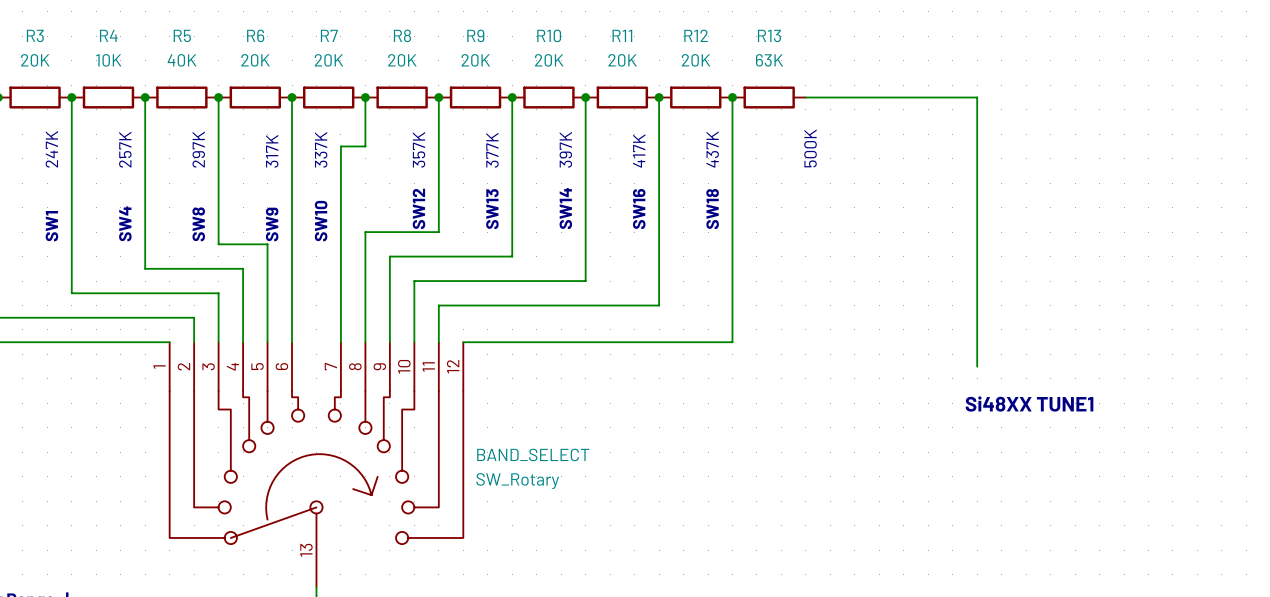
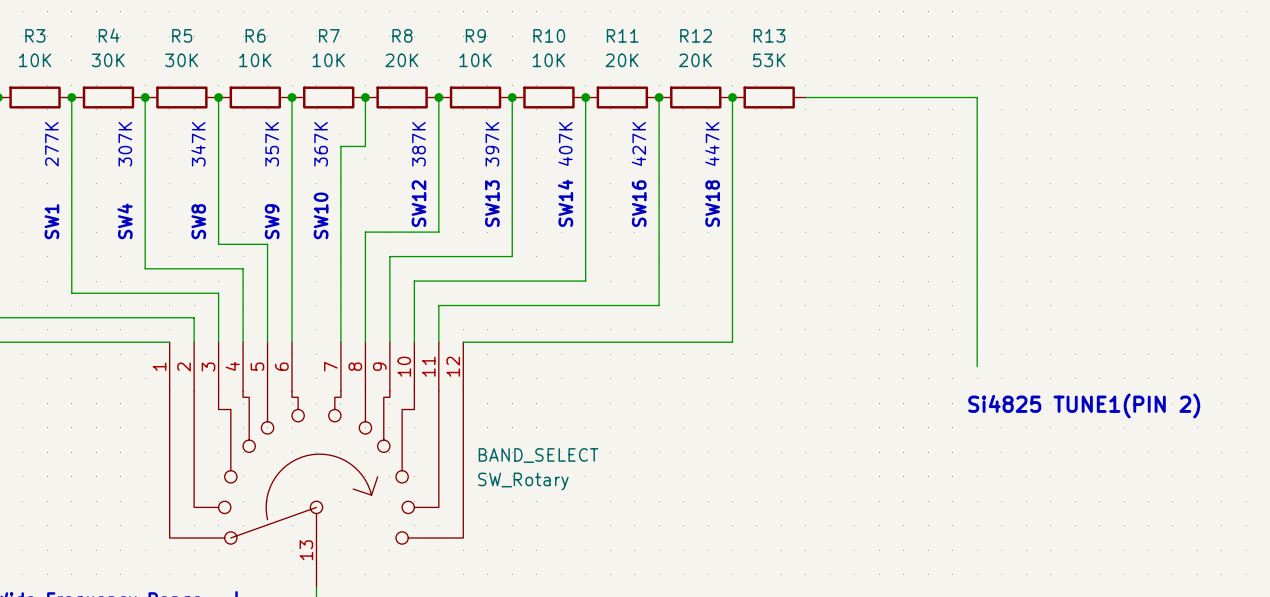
R3 value: 20K (35, 60) -> 10K (35, 60)
R4 value: 10K (108, 60) -> 30K (108, 60)
R5 value: 40K (182, 60) -> 30K (181, 60)
R6 value: 20K (255, 60) -> 10K (255, 60)
R7 value: 20K (328, 60) -> 10K (328, 60)
R9 value: 20K (475, 60) -> 10K (475, 60)
R10 value: 20K (549, 60) -> 10K (548, 60)
R13 value: 63K (769, 60) -> 53K (769, 60)
text: 500K (810, 148) -> none
text: 247K (51, 149) -> 277K (51, 144)
text: 257K (125, 149) -> 307K (125, 144)
text: 297K (198, 149) -> 347K (198, 144)
text: 337K (321, 149) -> 367K (321, 144)
text: 357K (419, 149) -> 387K (418, 144)
text: 397K (565, 149) -> 407K (565, 143)
text: 437K (712, 149) -> 447K (712, 143)
text: 377K (492, 150) -> 397K (492, 144)
text: 417K (639, 150) -> 427K (638, 143)
text: 317K (272, 151) -> 357K (272, 144)
text: Si48XX TUNE1 (1029, 404) -> Si4825 TUNE1(PIN 2) (1084, 405)

